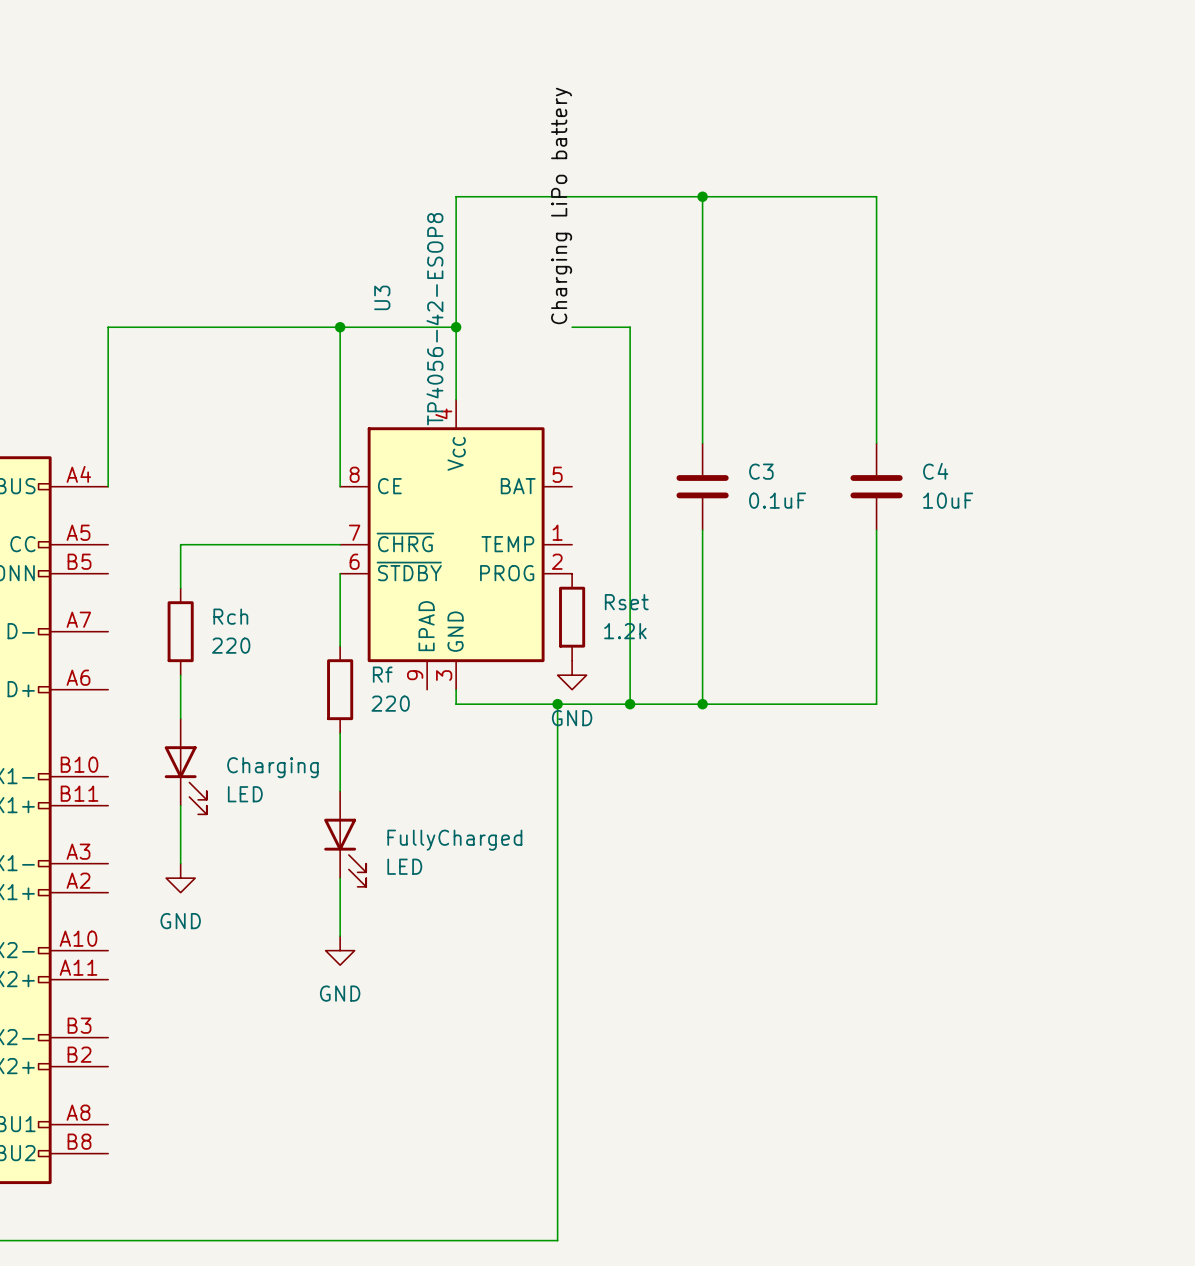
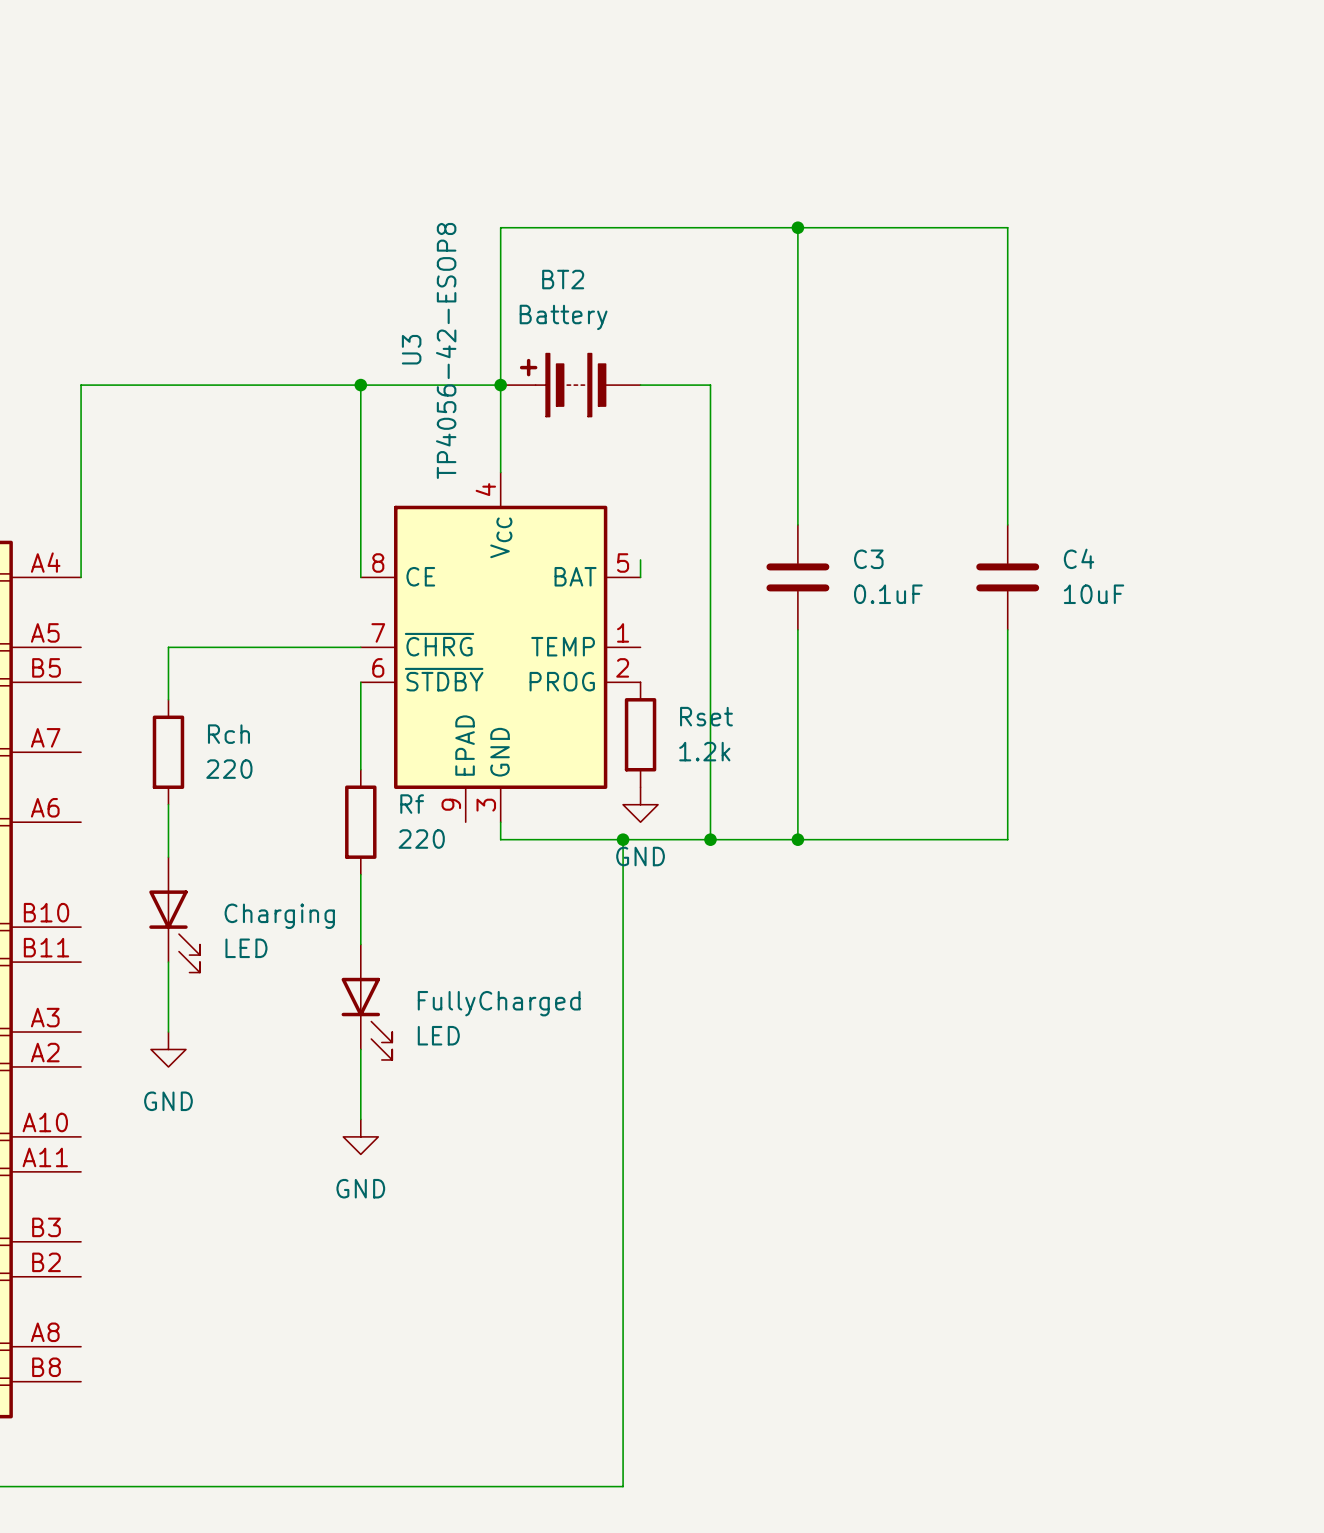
label: Charging LiPo battery (561, 205) -> none
U3 value position: TP4056-42-ESOP8 (434, 319) -> TP4056-42-ESOP8 (446, 350)
BT2: none -> Battery (570, 385)
wire: none -> (640, 559) (640, 577)

